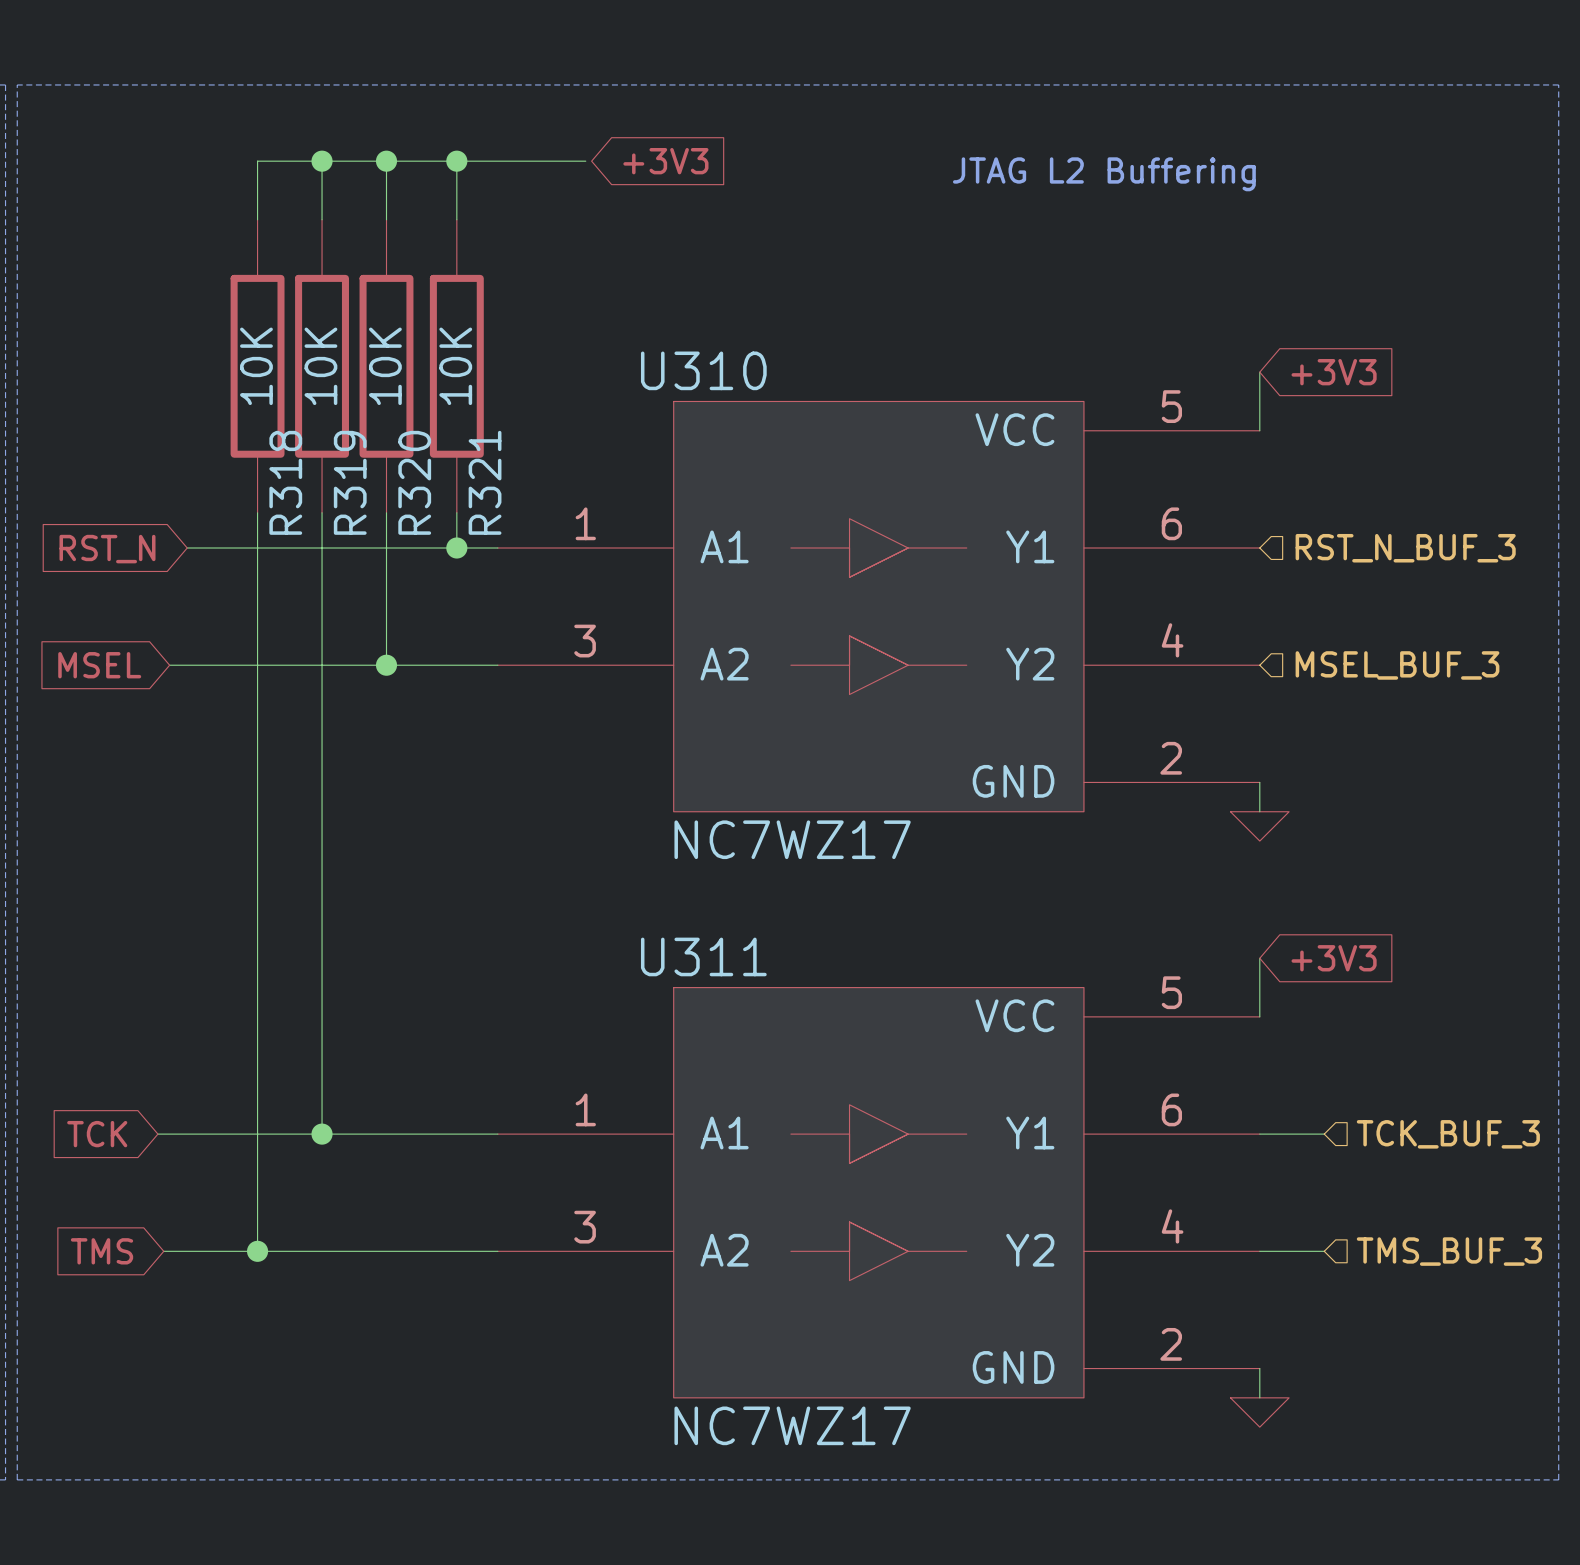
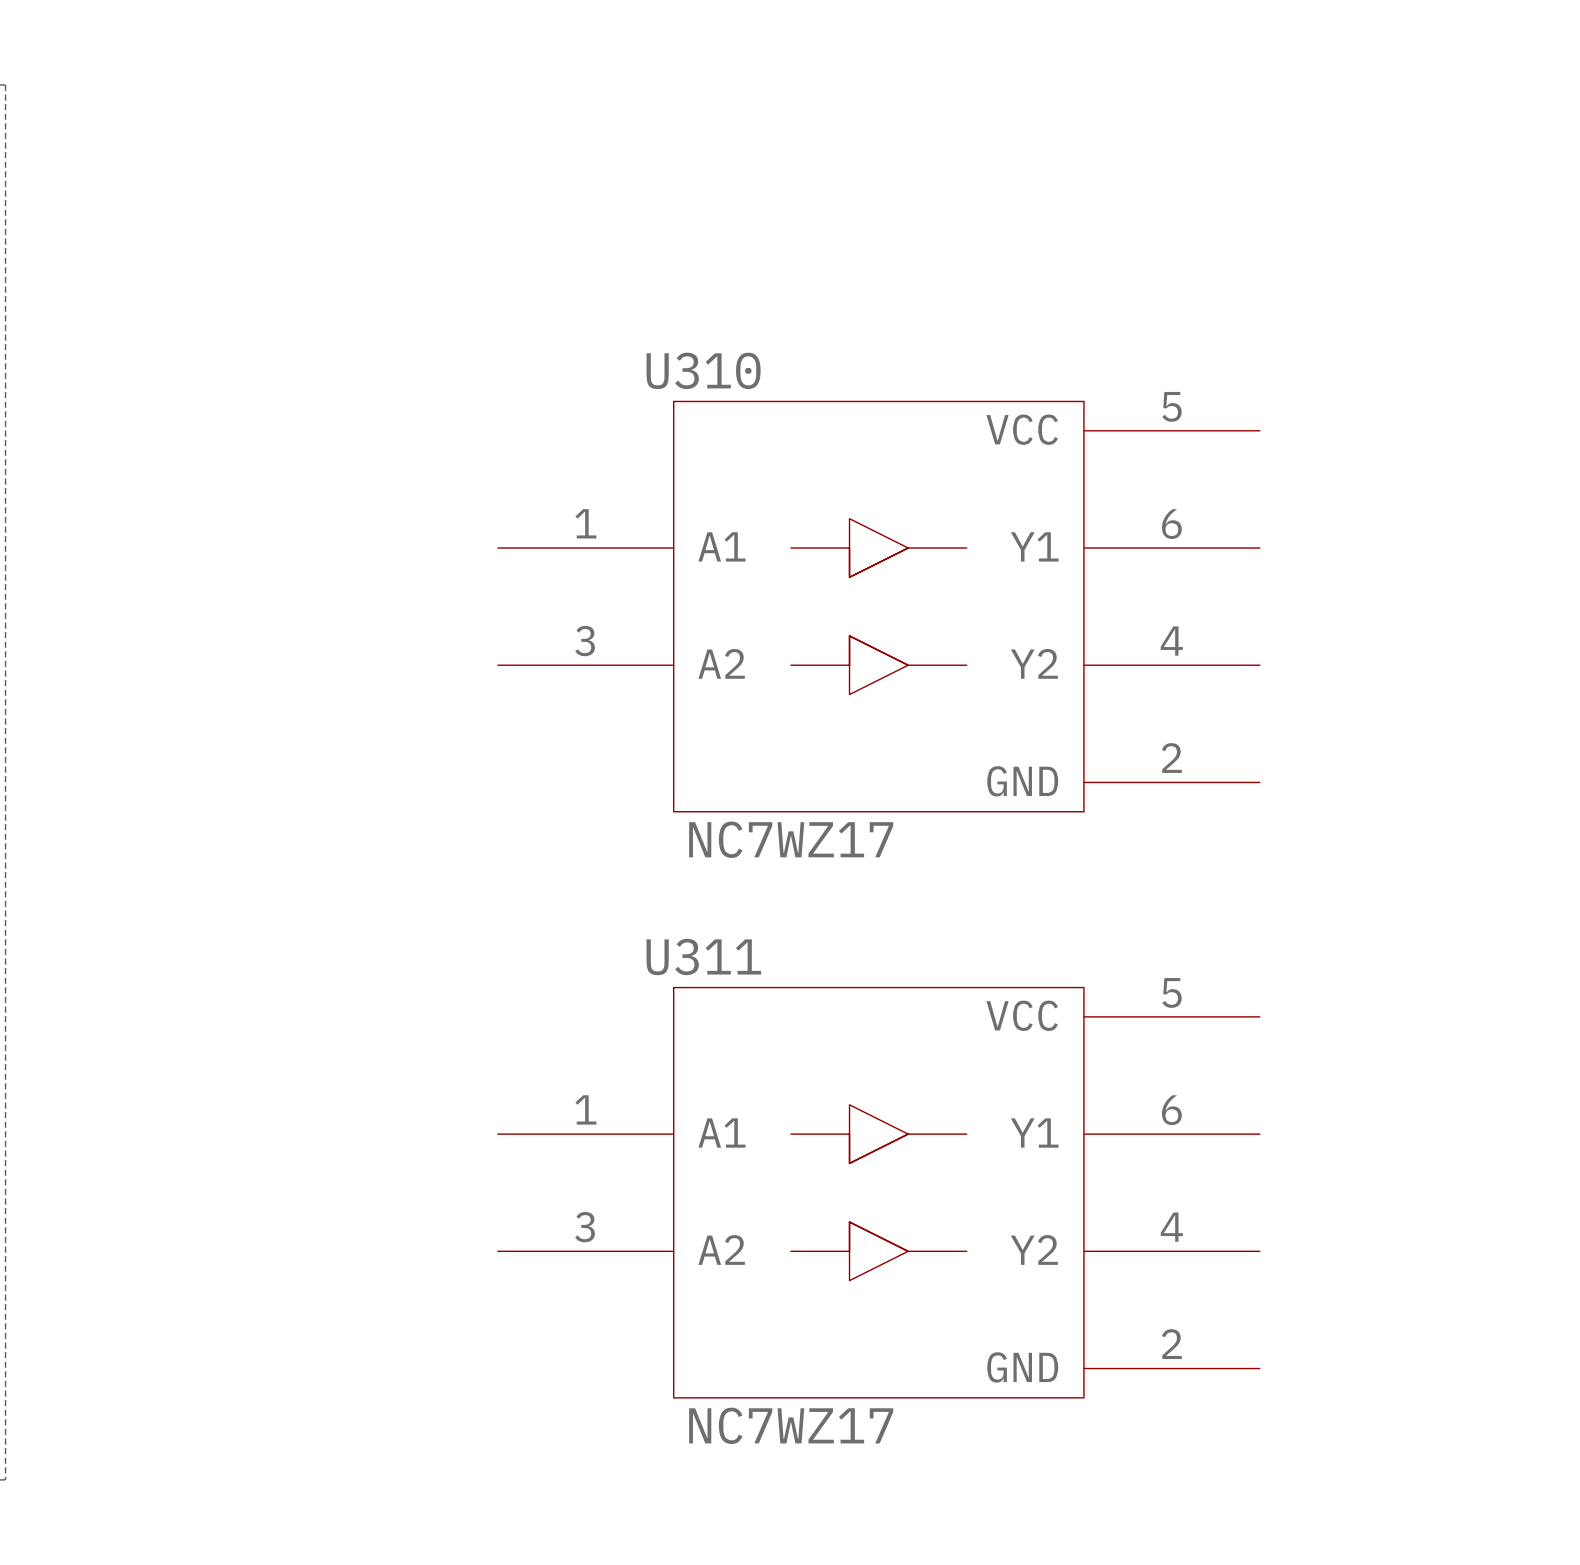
line: (17, 84) (1558, 84) (1558, 1479) (17, 1479) (17, 84) -> none
wire: (322, 161) (322, 219) -> none
junction: (322, 161) -> none
wire: (386, 161) (386, 219) -> none
junction: (386, 161) -> none
wire: (456, 161) (456, 219) -> none
junction: (456, 161) -> none
wire: (585, 161) (257, 161) (257, 219) -> none
global label: +3V3 (665, 161) -> none
text: JTAG L2 Buffering (1104, 174) -> none
R318: 10K (257, 366) -> none
R319: 10K (322, 366) -> none
R320: 10K (386, 366) -> none
R321: 10K (456, 366) -> none
wire: (1259, 372) (1259, 430) -> none
global label: +3V3 (1334, 372) -> none
wire: (257, 512) (257, 1251) -> none
wire: (322, 512) (322, 1134) -> none
wire: (386, 512) (386, 665) -> none
wire: (456, 512) (456, 548) -> none
wire: (187, 548) (497, 548) -> none
junction: (456, 548) -> none
hierarchical label: RST_N_BUF_3 (1405, 548) -> none
global label: RST_N (107, 549) -> none
global label: MSEL (99, 665) -> none
wire: (169, 665) (497, 665) -> none
junction: (386, 665) -> none
hierarchical label: MSEL_BUF_3 (1397, 665) -> none
wire: (1259, 782) (1259, 811) -> none
power symbol: (1259, 826) -> none
wire: (1259, 958) (1259, 1016) -> none
global label: +3V3 (1334, 958) -> none
global label: TCK (97, 1134) -> none
wire: (157, 1134) (497, 1134) -> none
junction: (322, 1134) -> none
wire: (1259, 1134) (1324, 1134) -> none
hierarchical label: TCK_BUF_3 (1448, 1134) -> none
global label: TMS (102, 1251) -> none
wire: (163, 1251) (497, 1251) -> none
junction: (257, 1251) -> none
wire: (1259, 1251) (1324, 1251) -> none
hierarchical label: TMS_BUF_3 (1449, 1251) -> none
wire: (1259, 1368) (1259, 1397) -> none
power symbol: (1259, 1412) -> none

